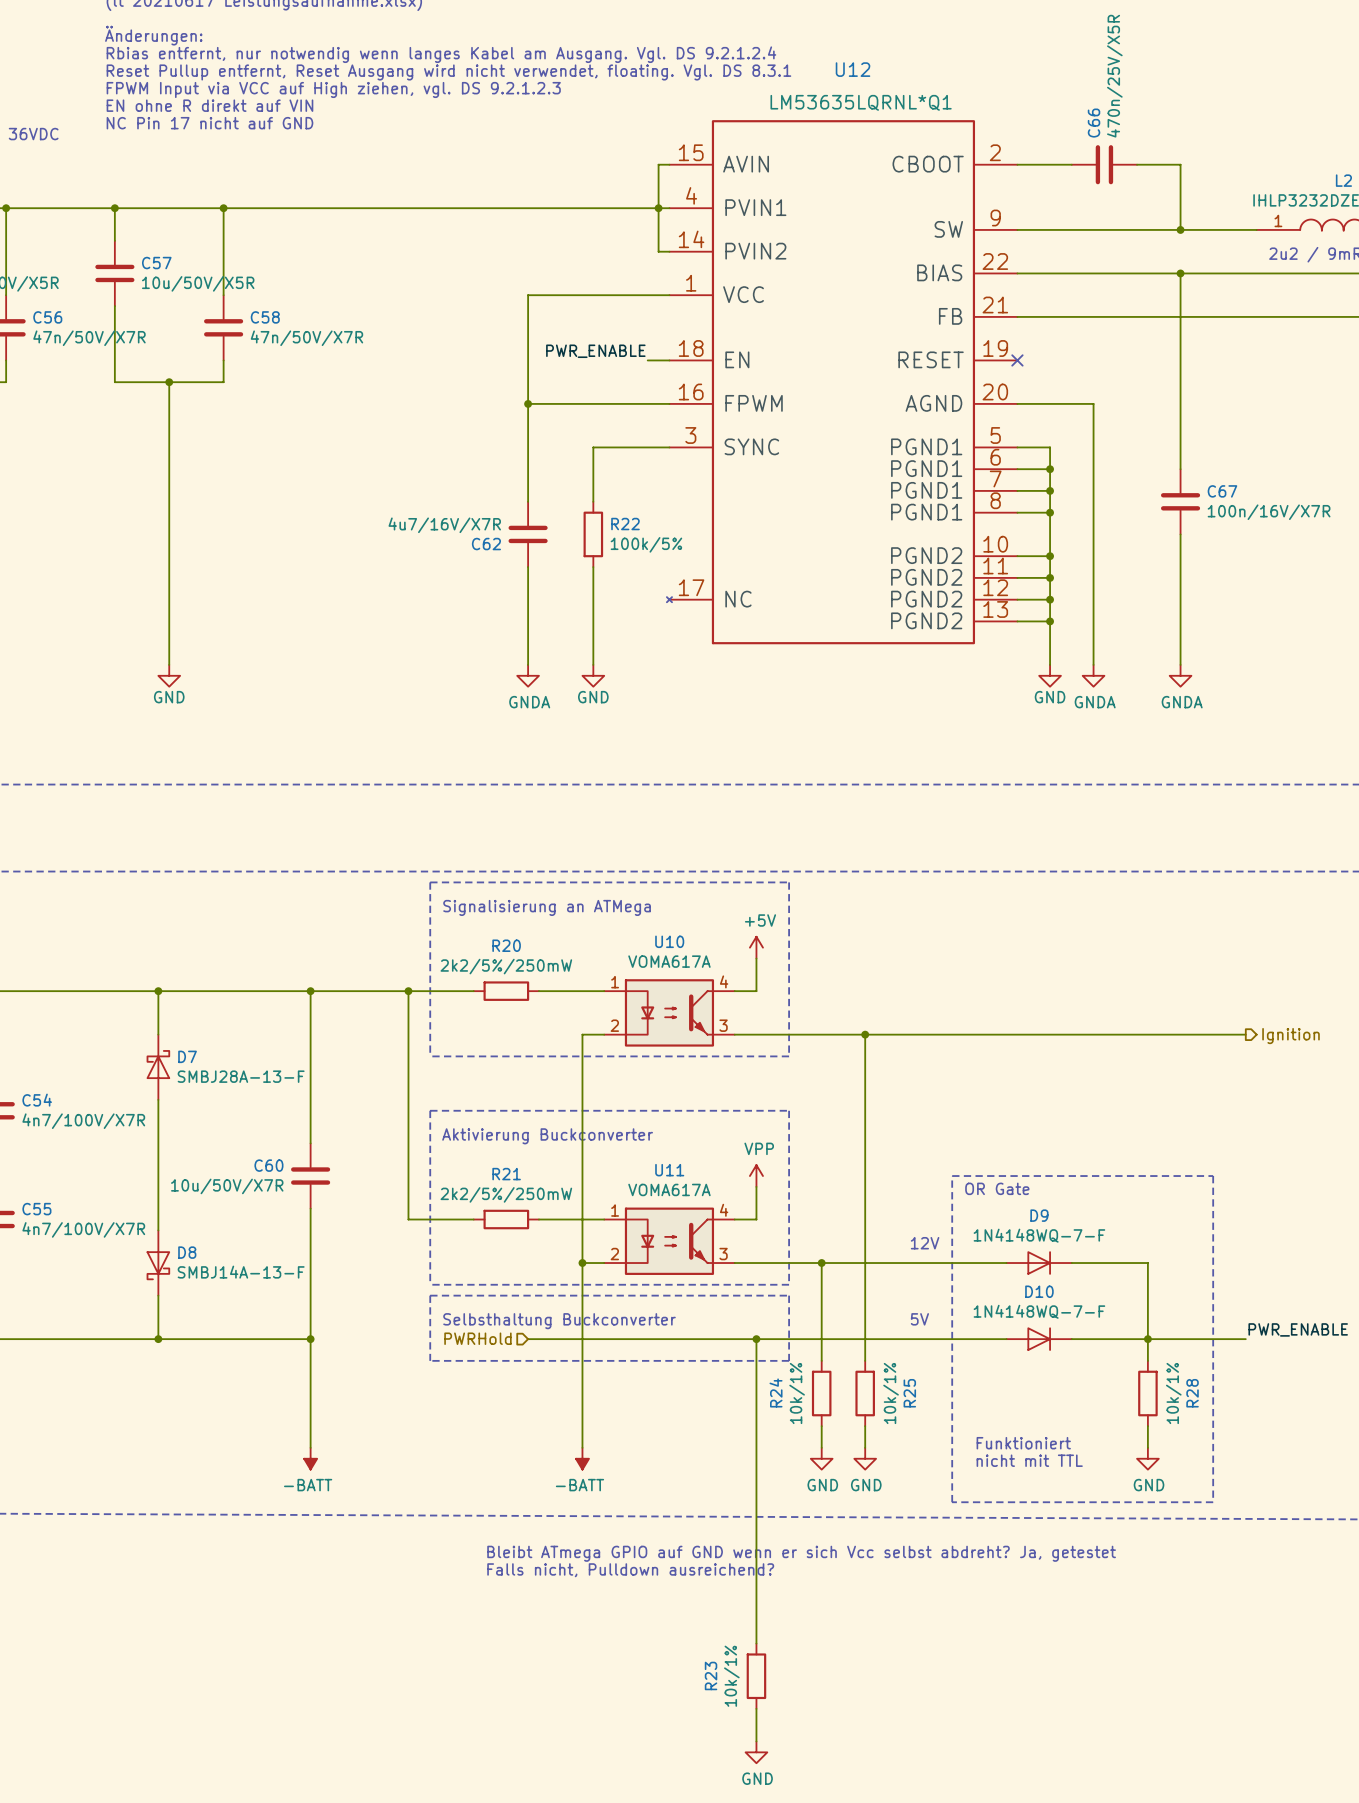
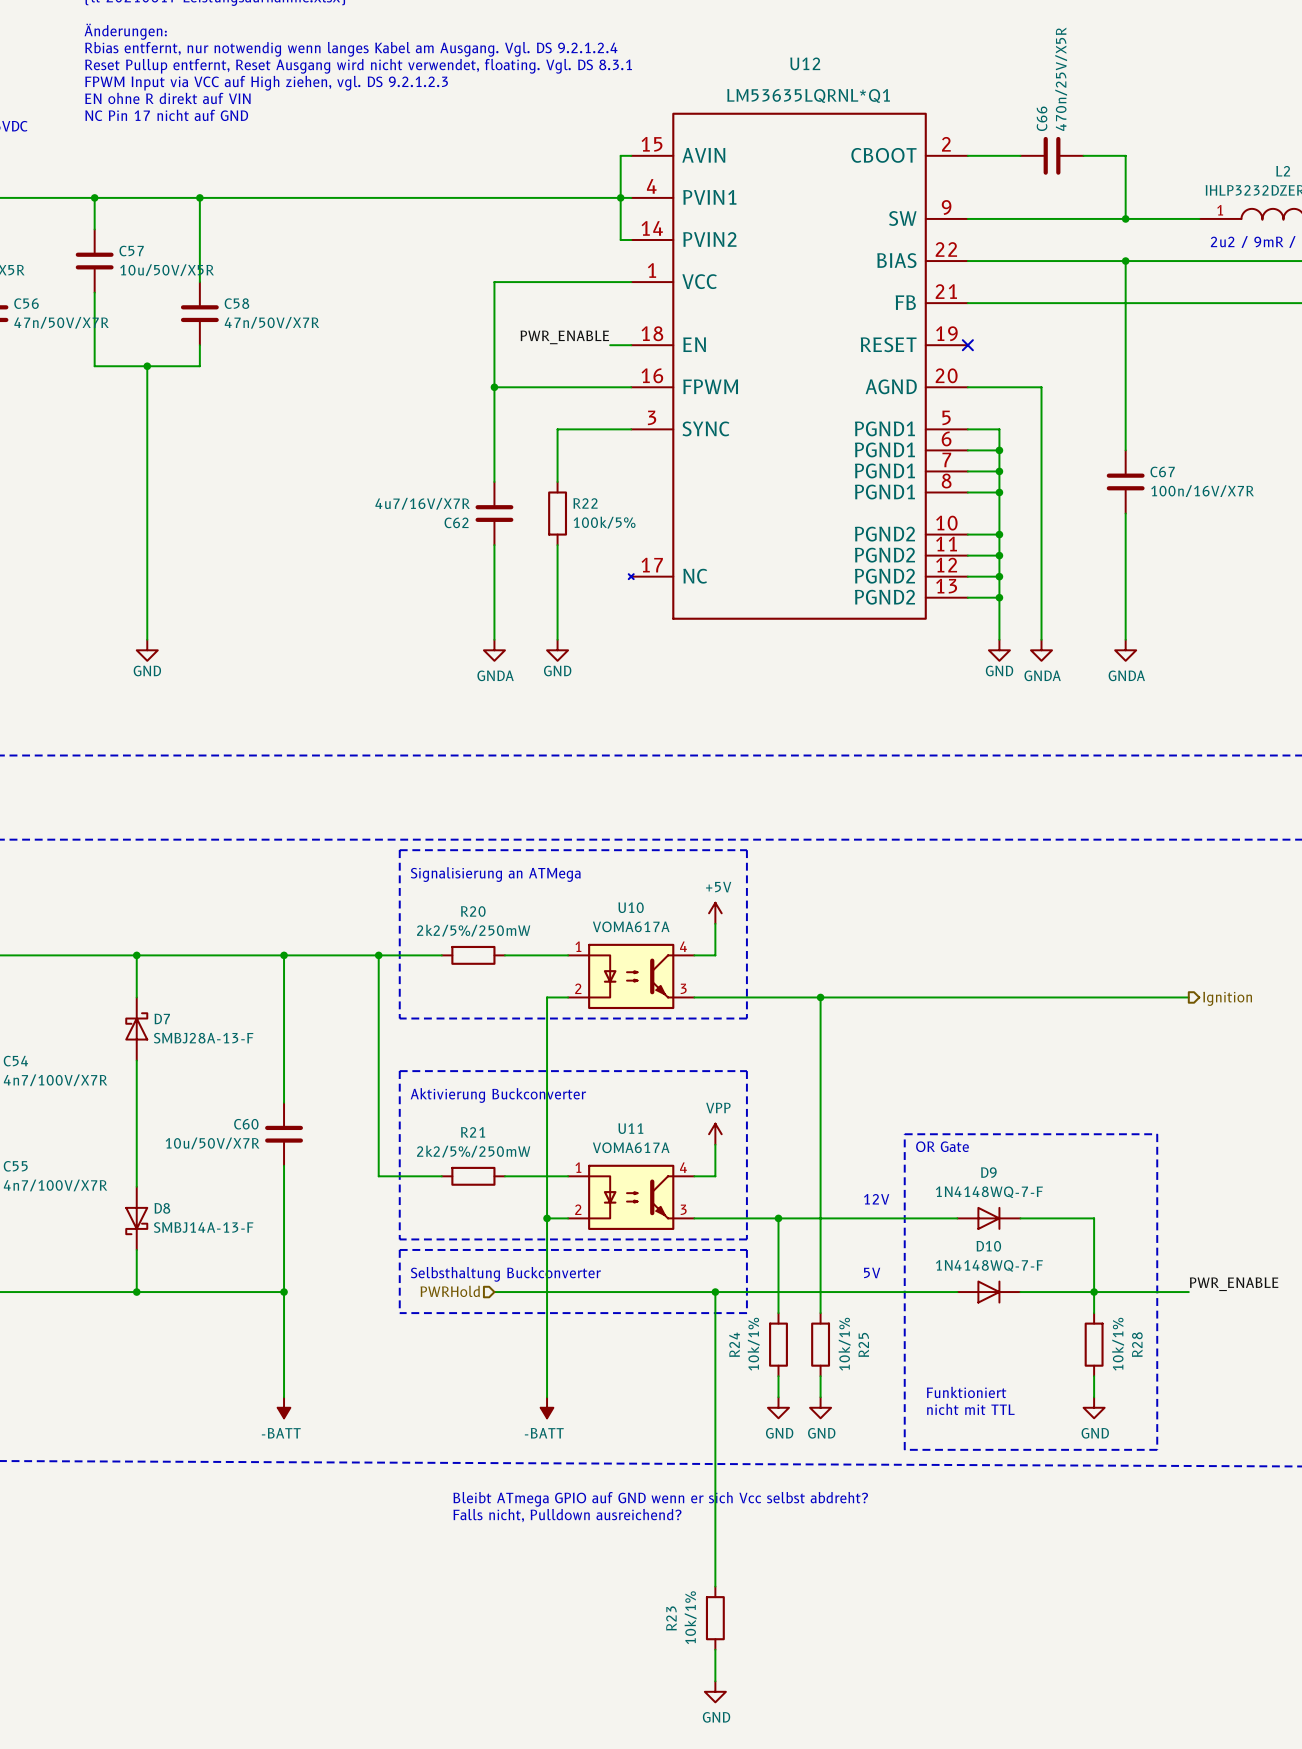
text: Bleibt ATmega GPIO auf GND wenn er sich Vcc selbst abdreht? Ja, getestet (801, 1553) -> Bleibt ATmega GPIO auf GND wenn er sich Vcc selbst abdreht? (660, 1499)

